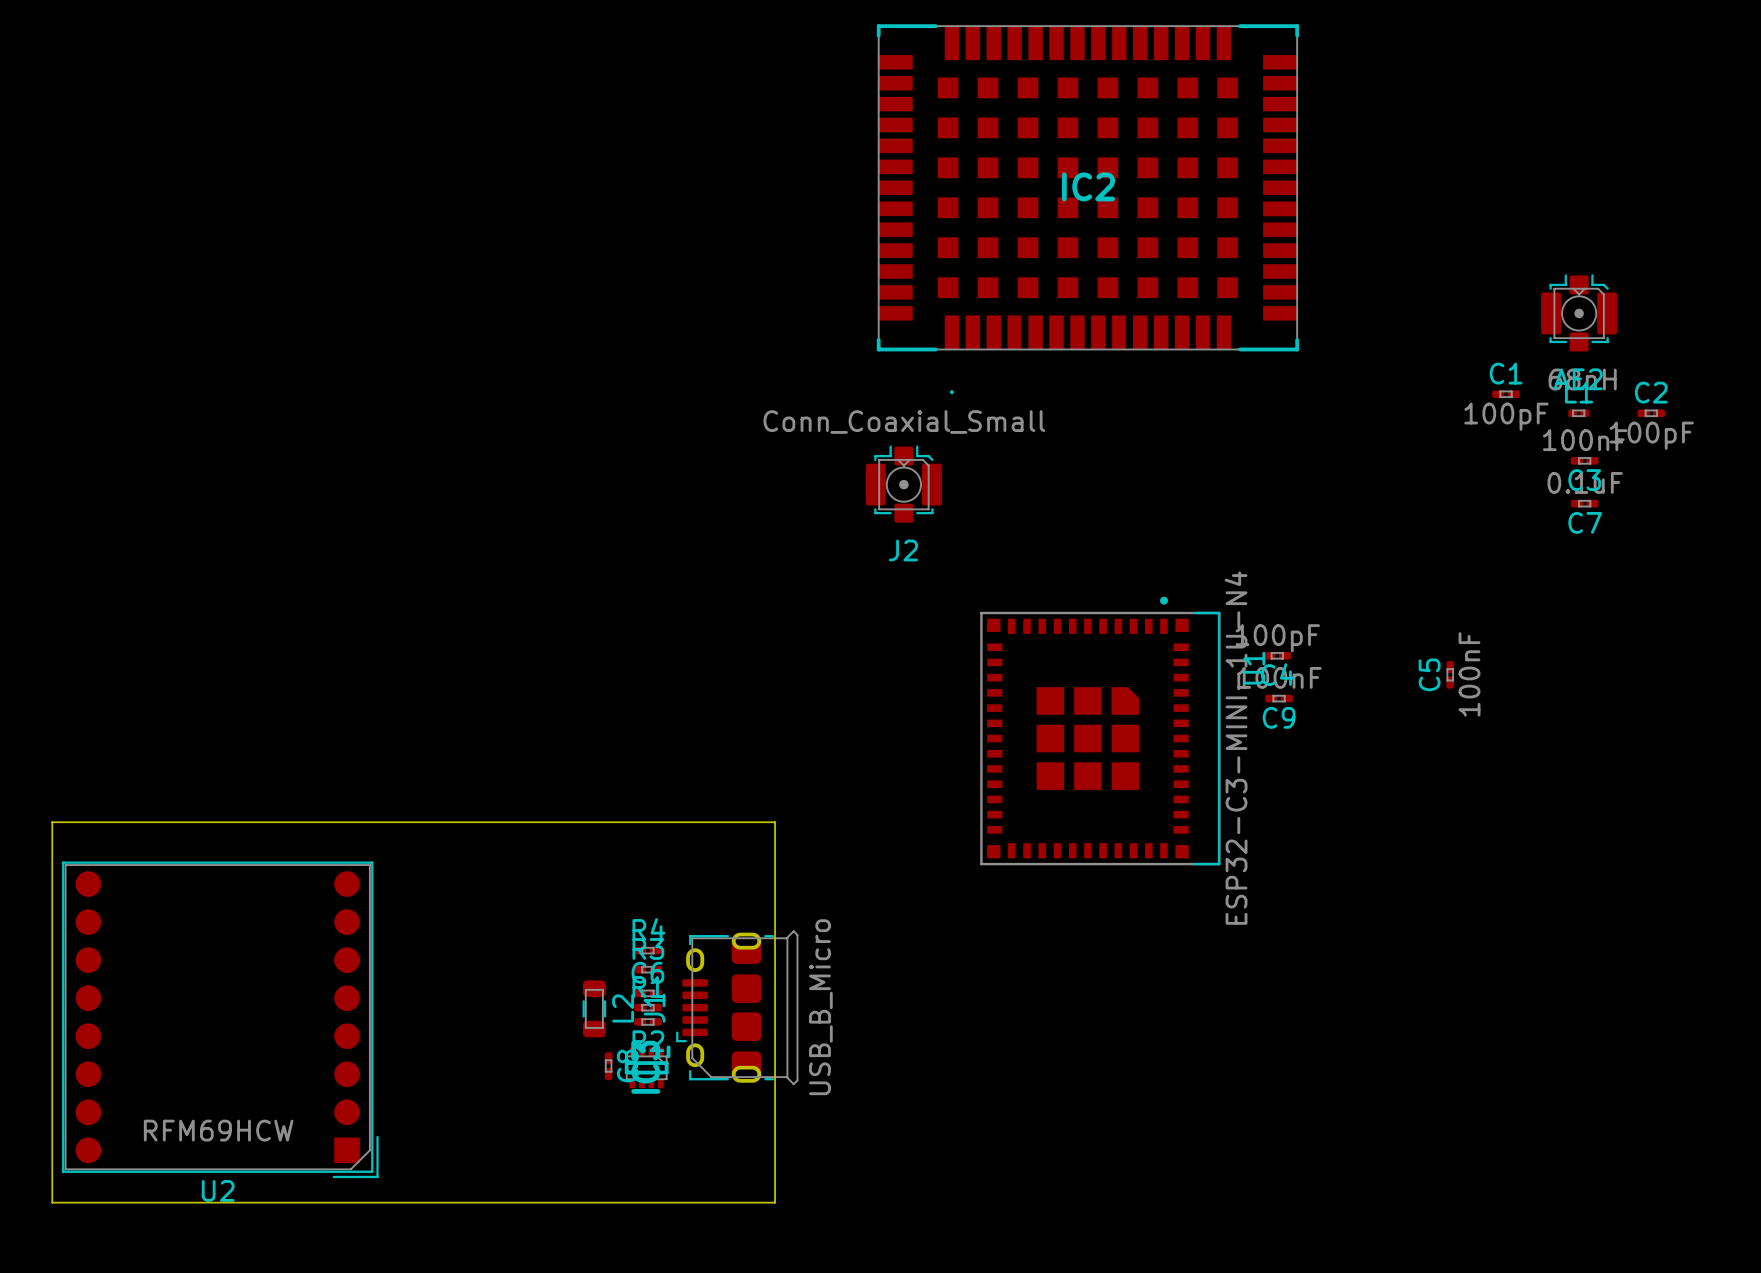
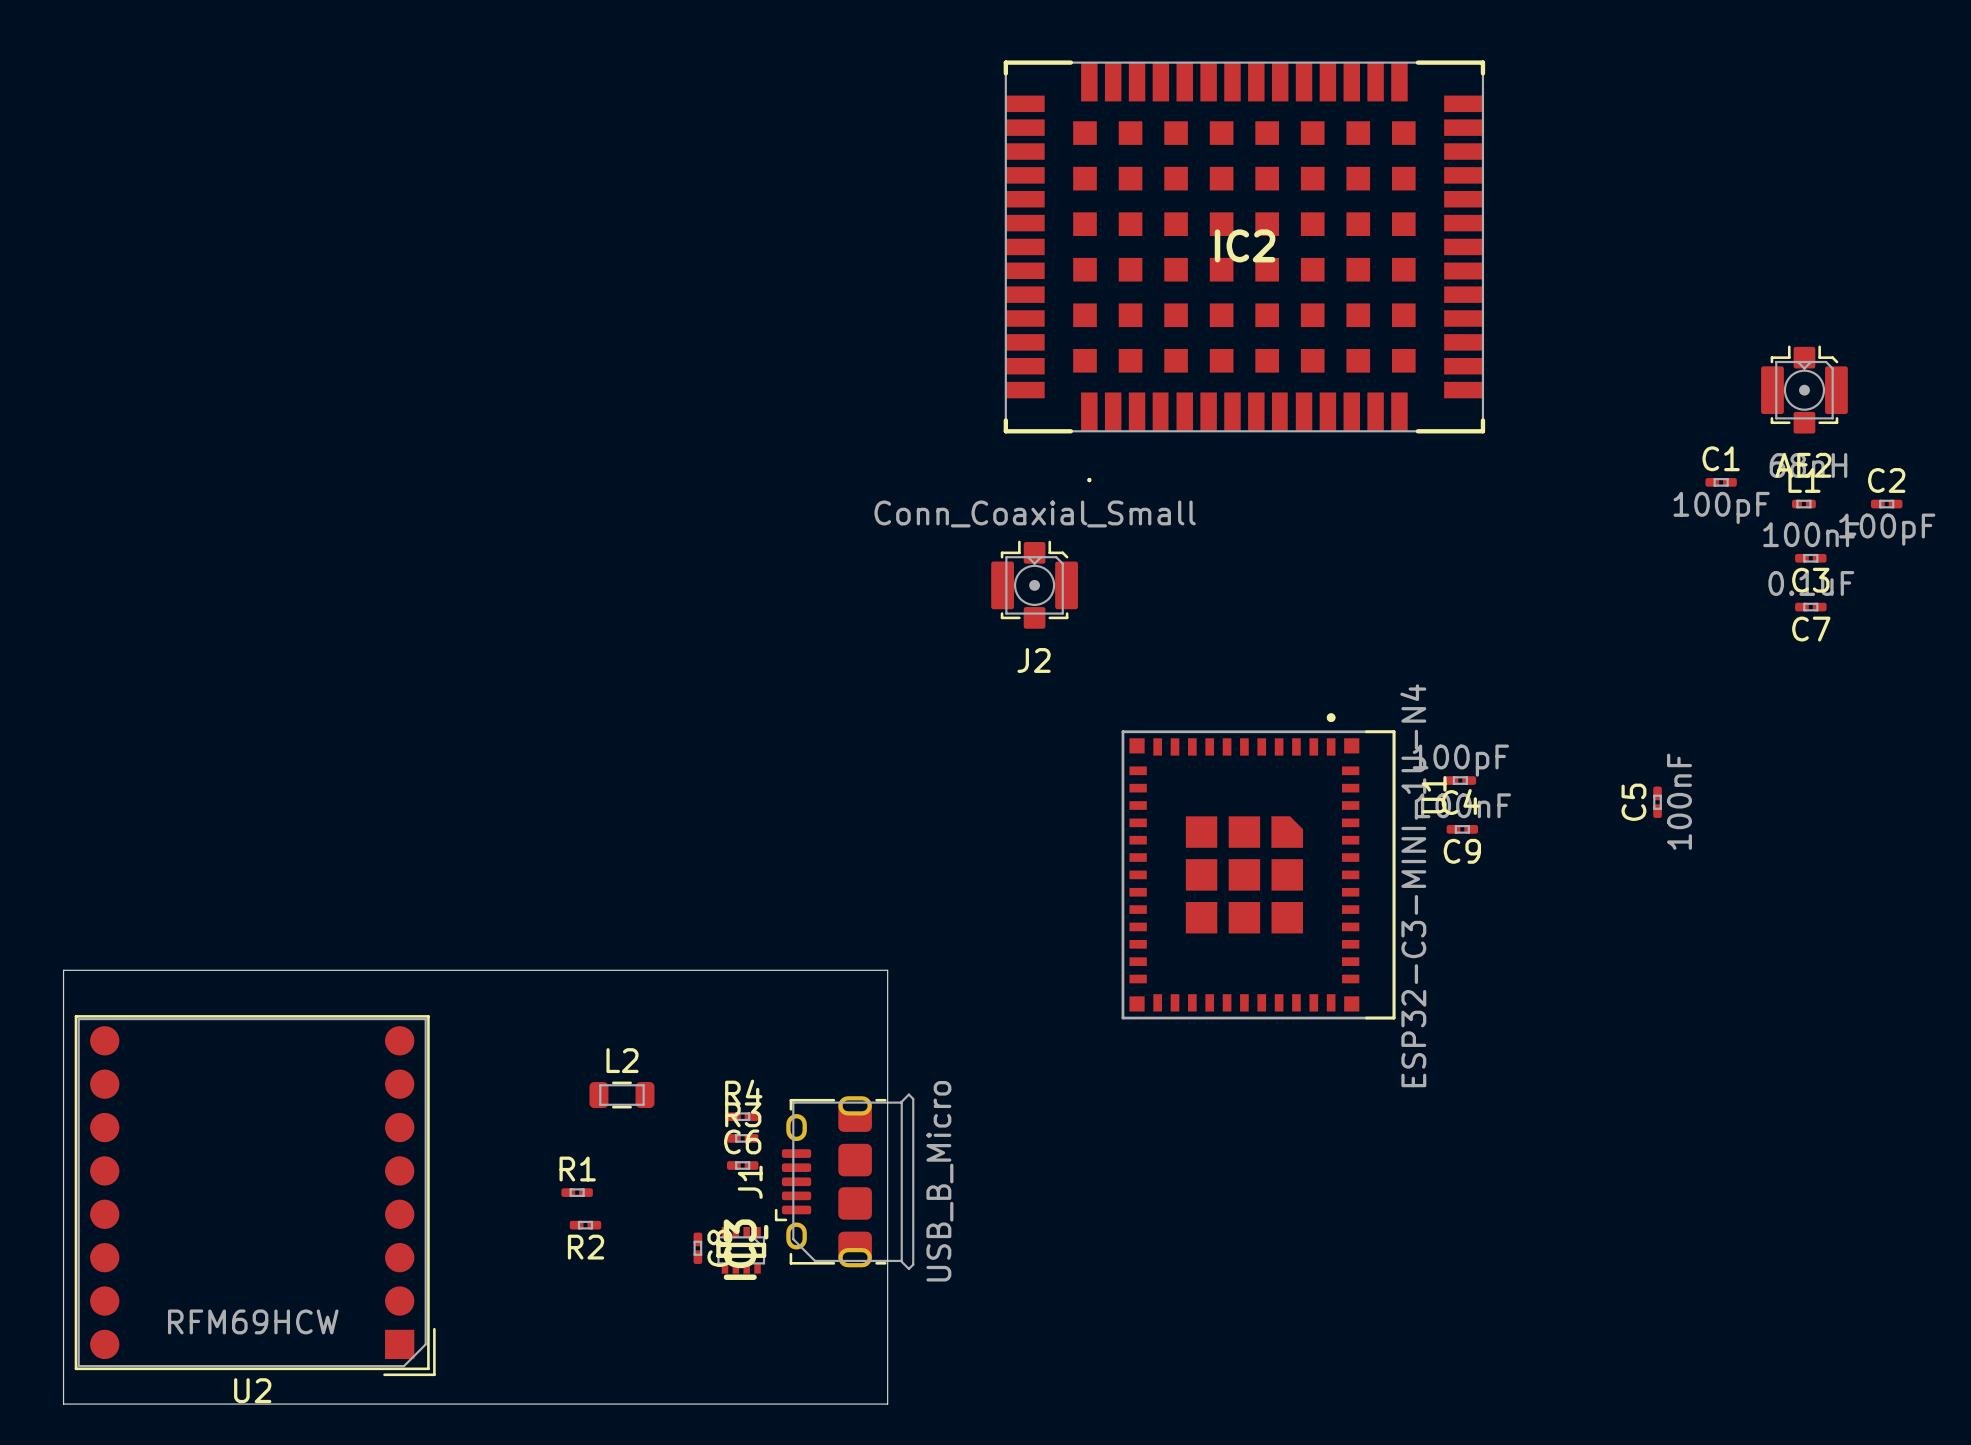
R1 position: (647, 1007) -> (577, 1192)
L2 rotation: 0° (594, 1008) -> 90° clockwise (621, 1095)
L2 position: (594, 1008) -> (621, 1095)
L2 name position: L2 (623, 1008) -> L2 (622, 1060)
R2 position: (647, 1021) -> (585, 1225)

